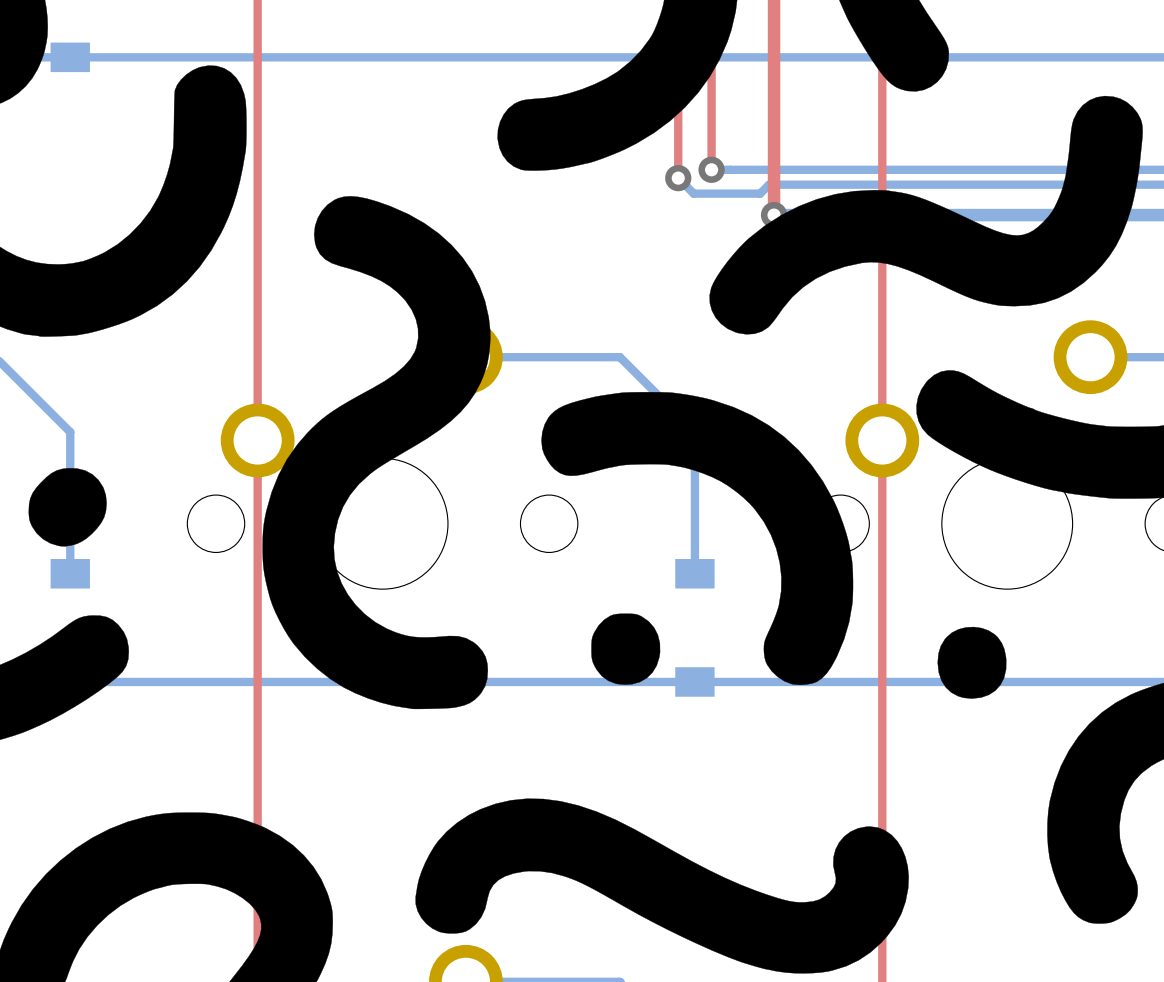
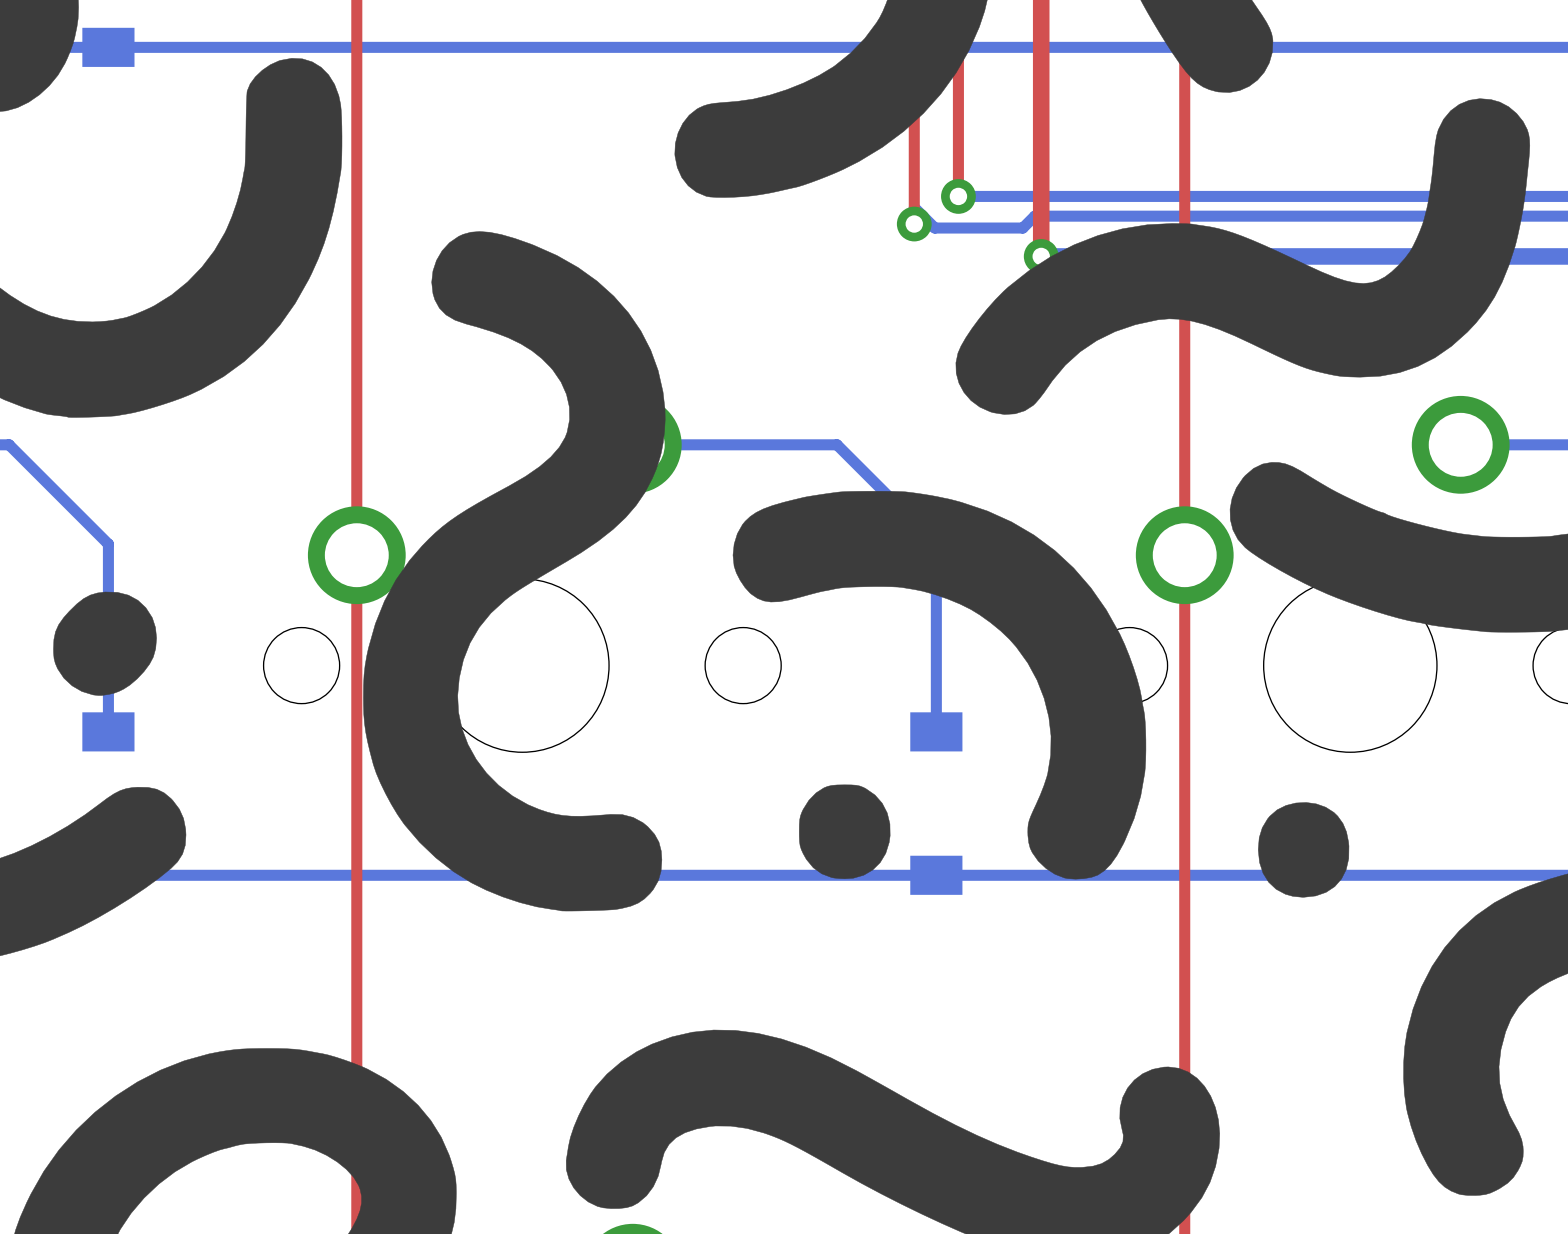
via position: (678, 178) -> (914, 224)

